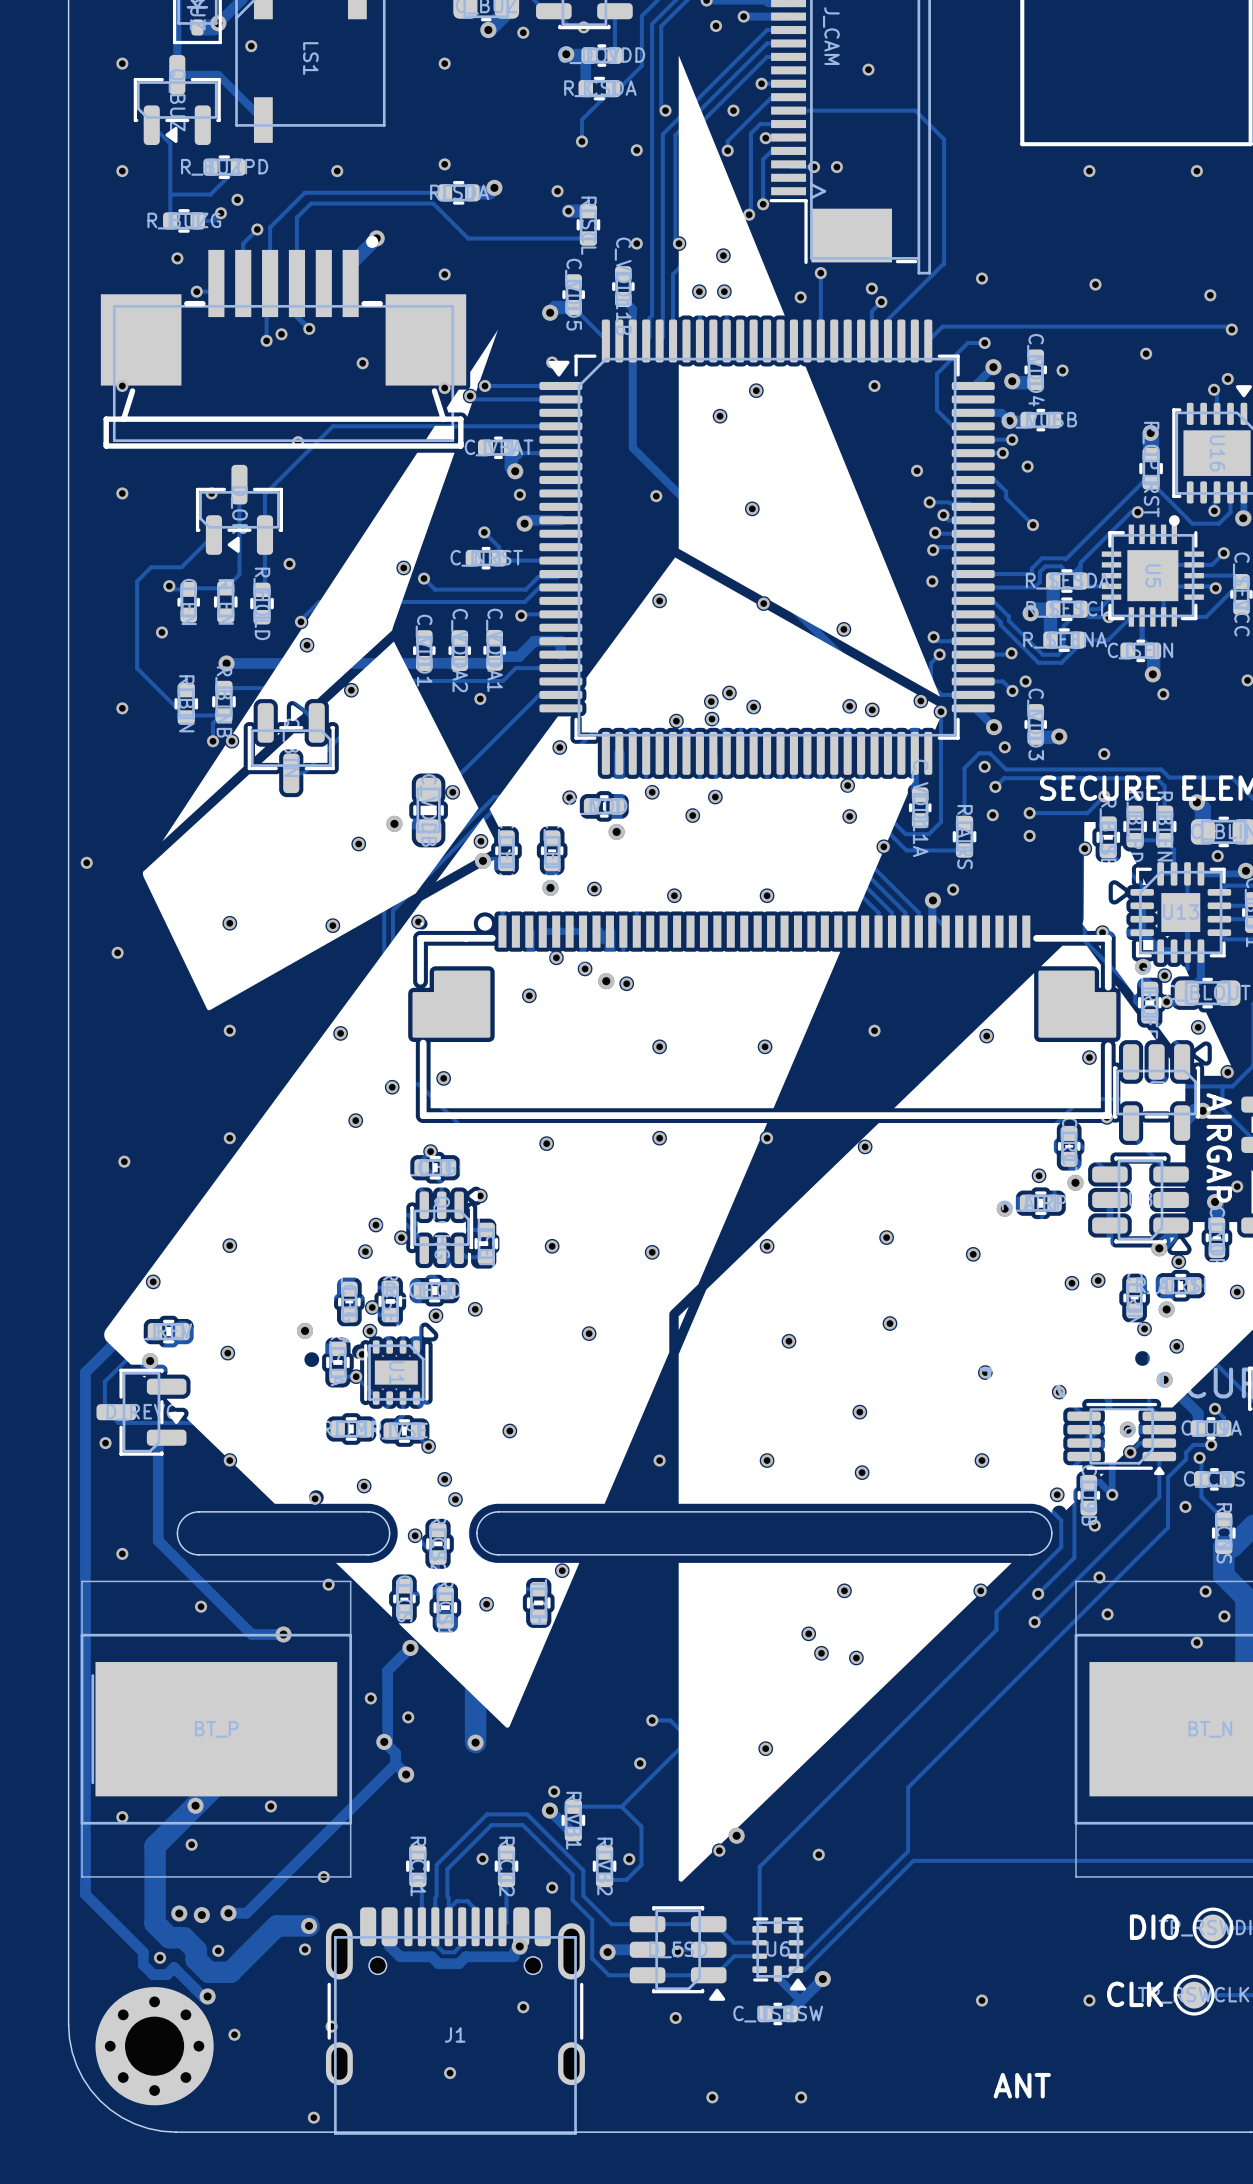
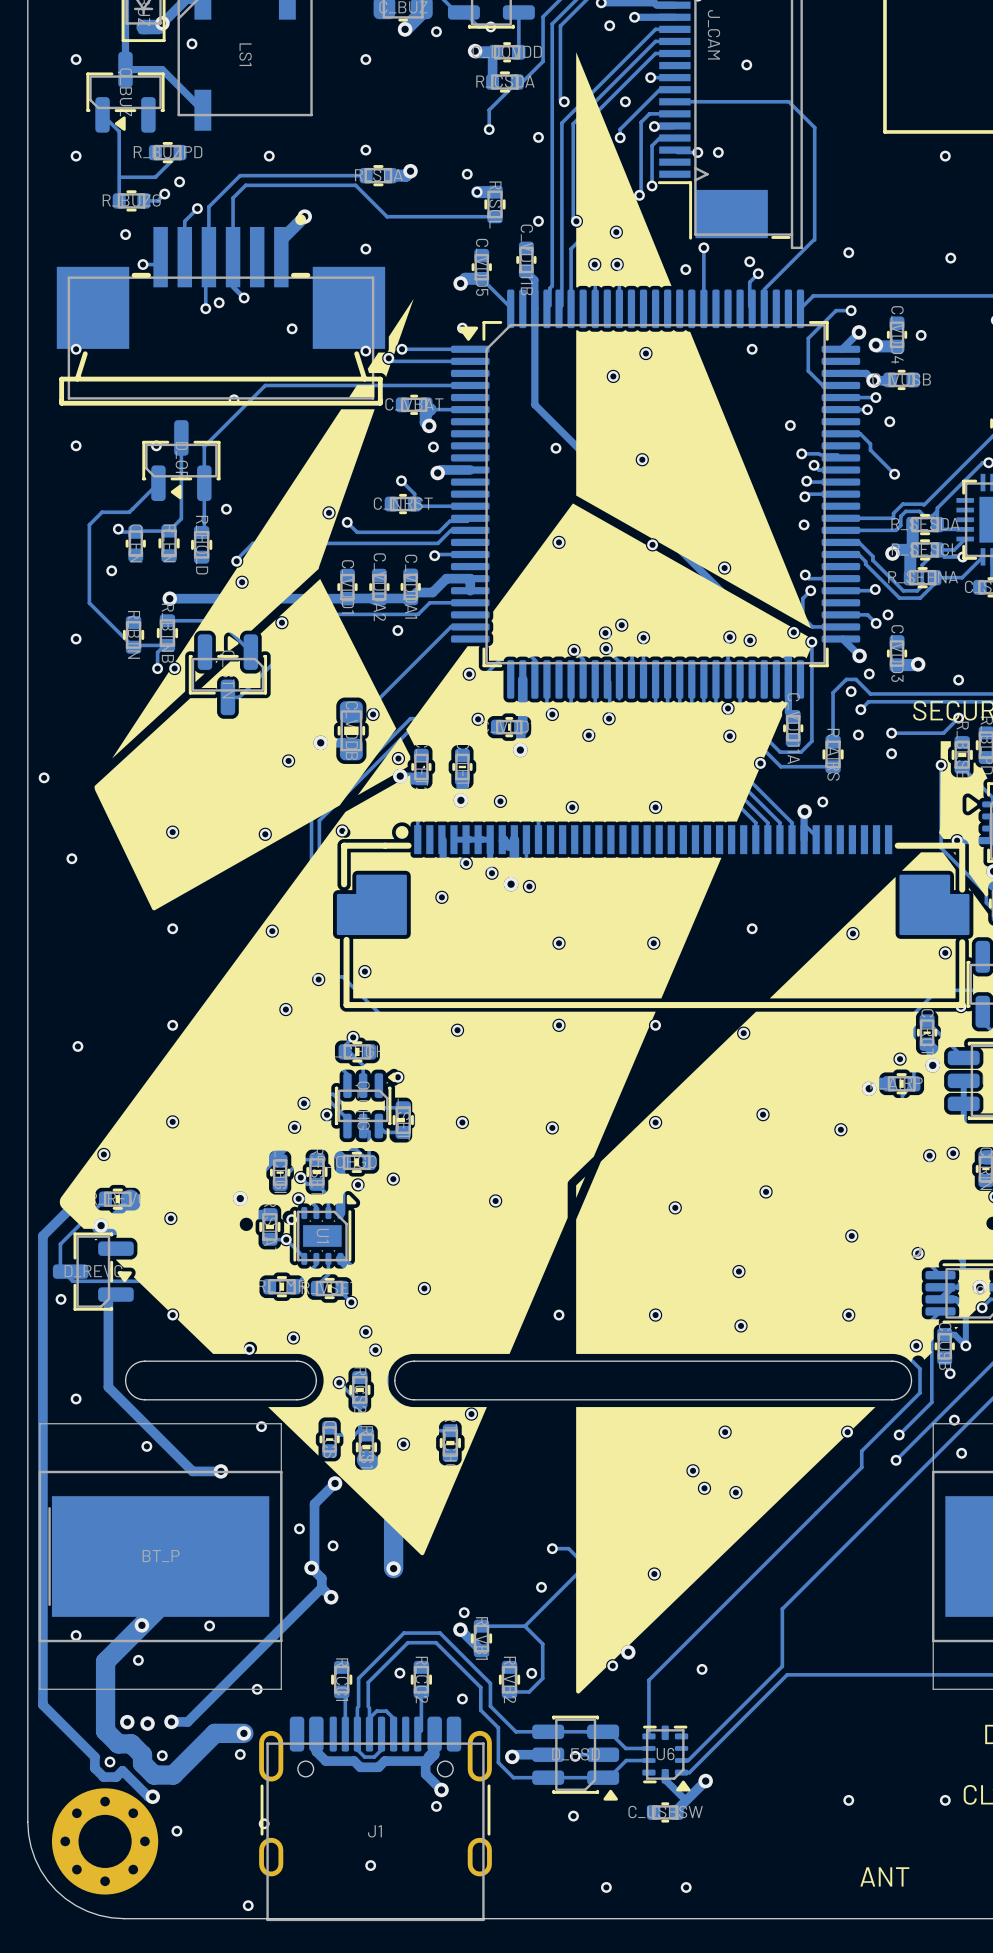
via position: (519, 1946) -> (441, 1789)
track: none -> (434, 1754) (425, 1763) (425, 1774) (441, 1789)

